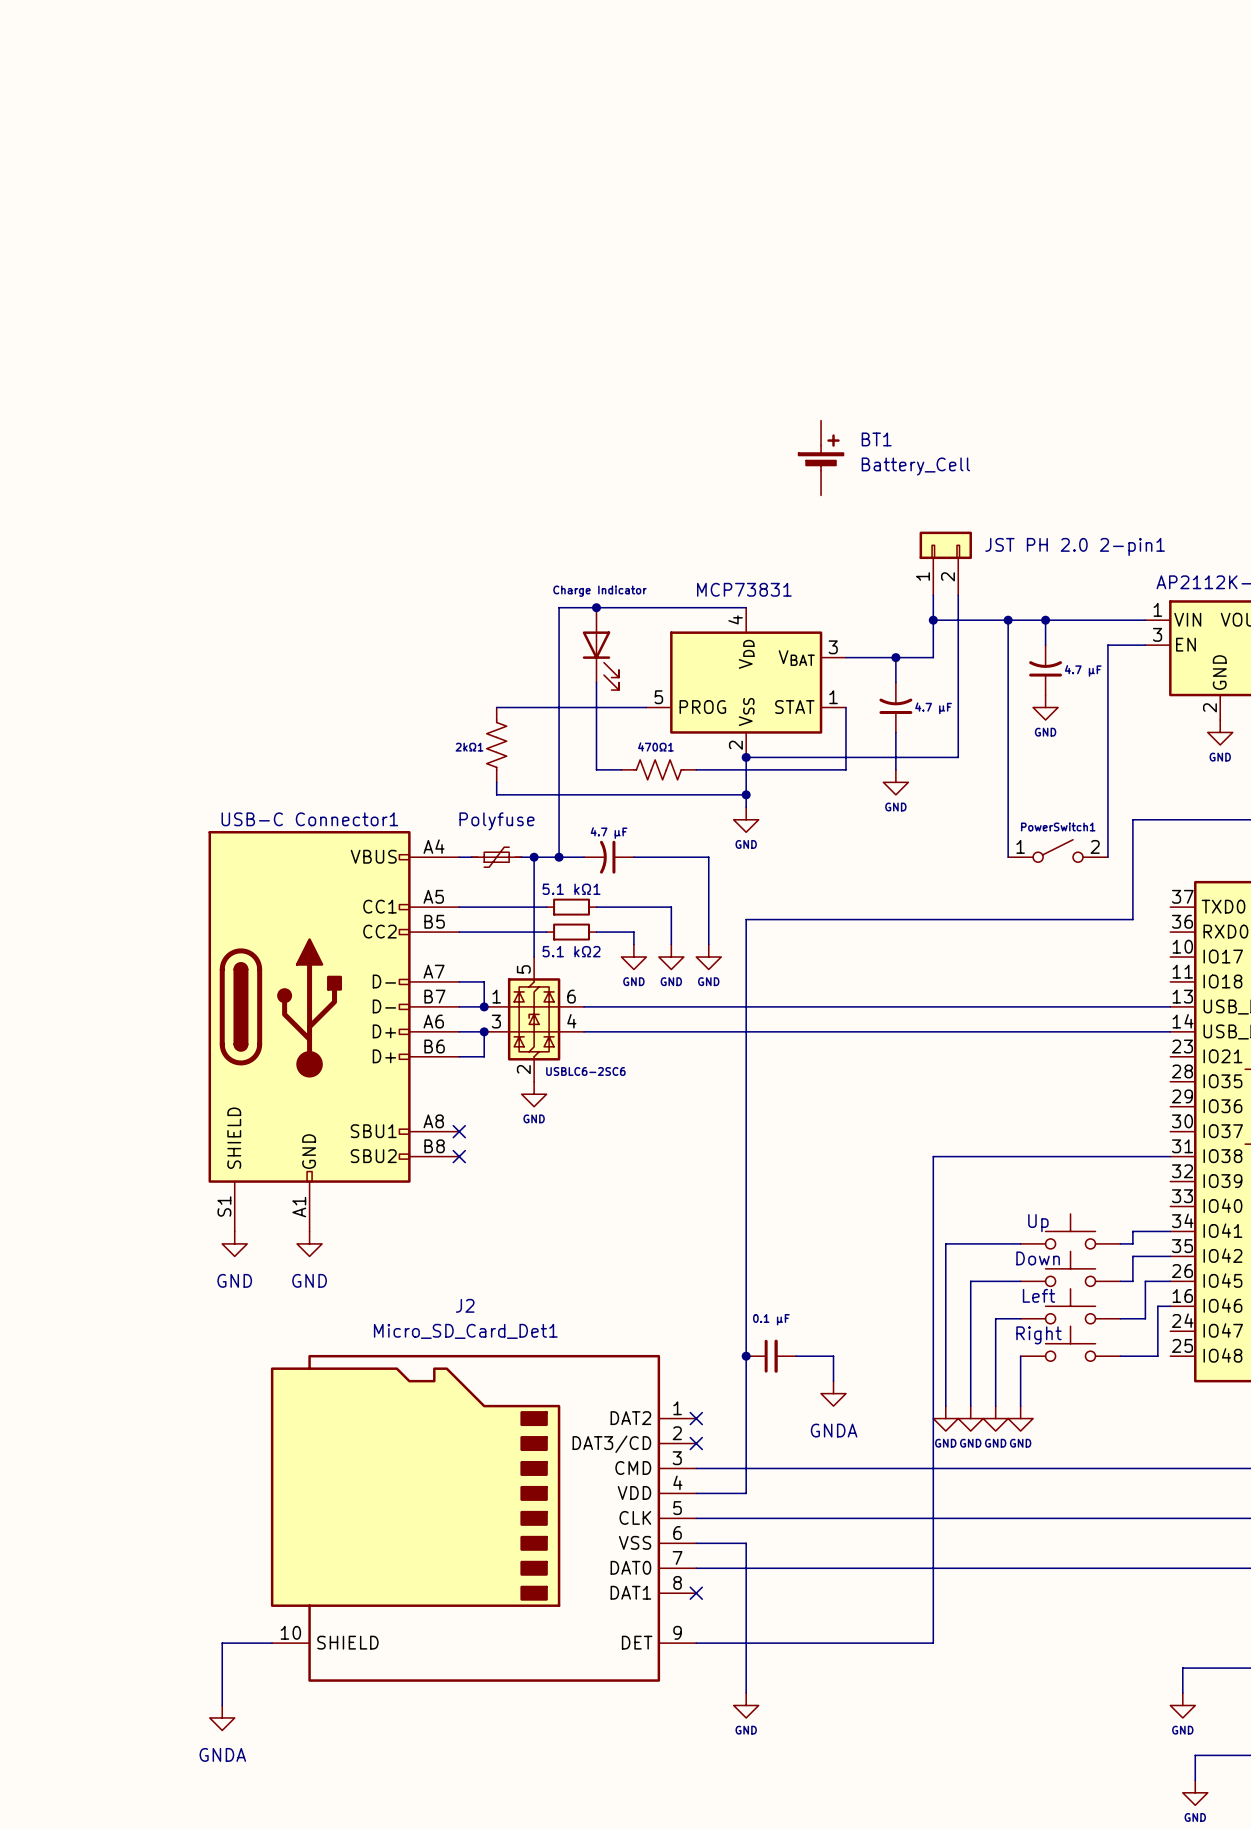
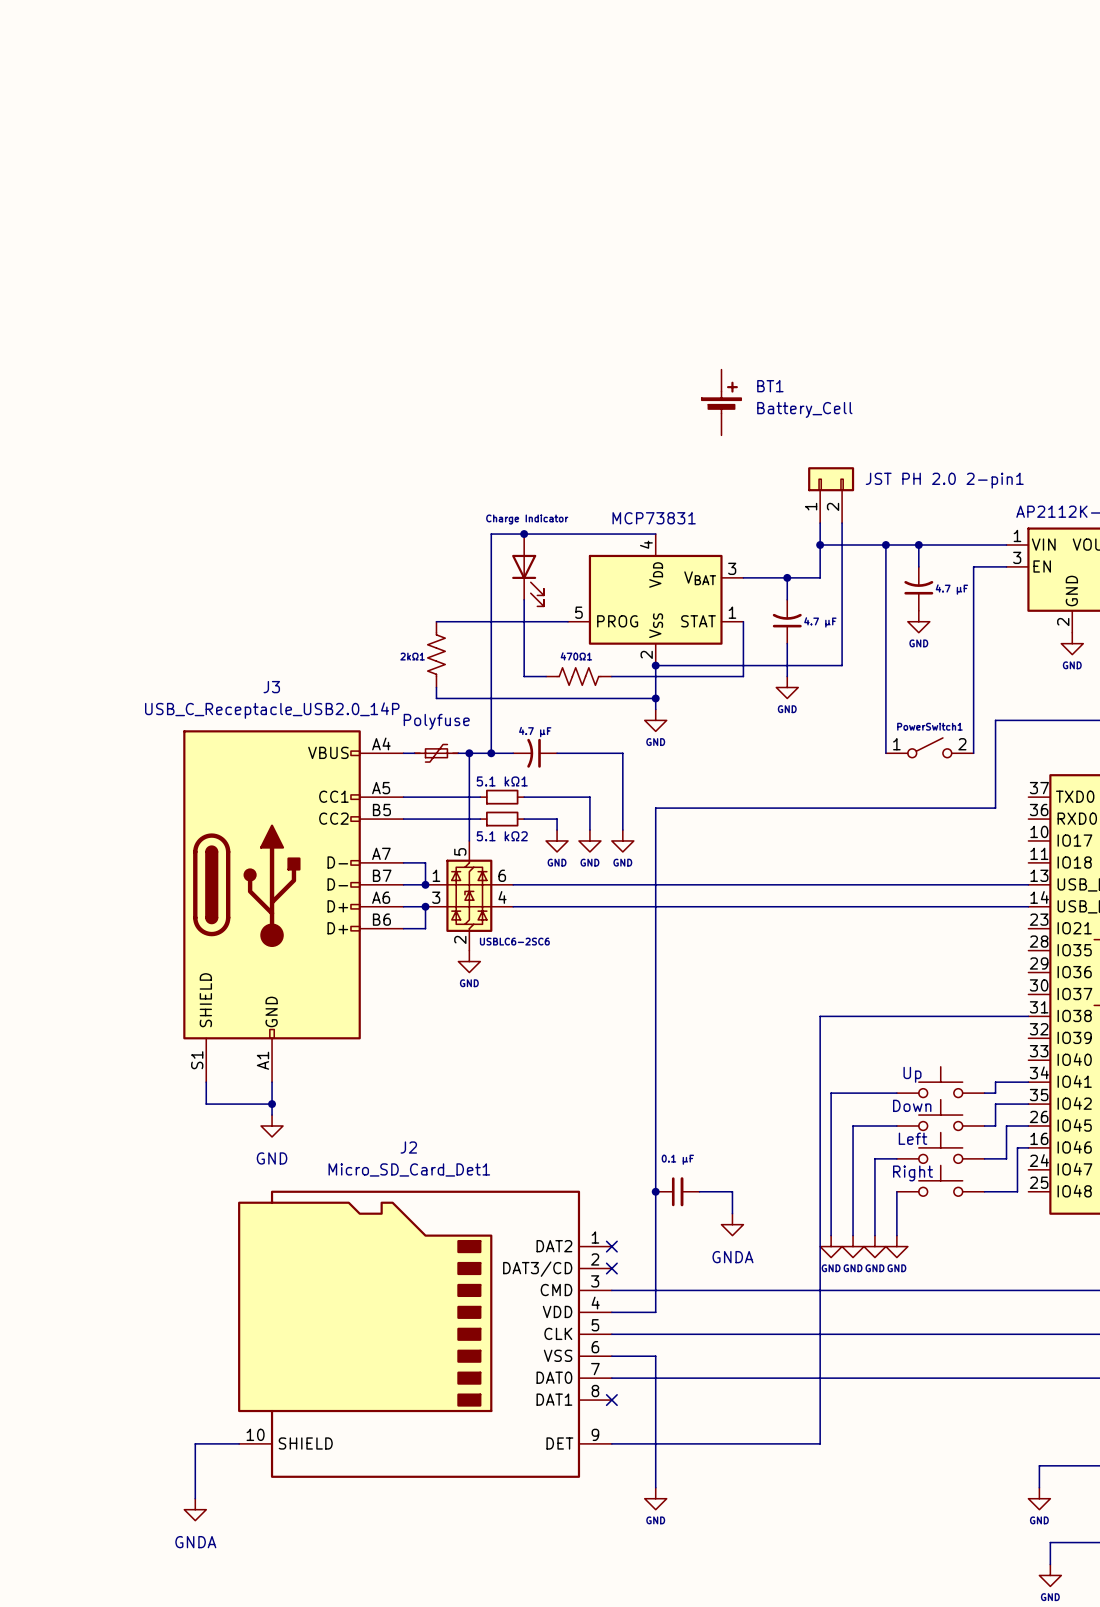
USB-C Connector1: (333, 1031) -> none
J3: none -> USB_C_Receptacle_USB2.0_14P (293, 906)
no-connect mark: (459, 1131) -> none
no-connect mark: (459, 1156) -> none
wire: none -> (206, 1082) (206, 1104) (272, 1104)
wire: none -> (272, 1082) (272, 1115)
power symbol: GND (234, 1243) -> none
power symbol position: GND (309, 1243) -> GND (272, 1126)
junction: none -> (272, 1104)

